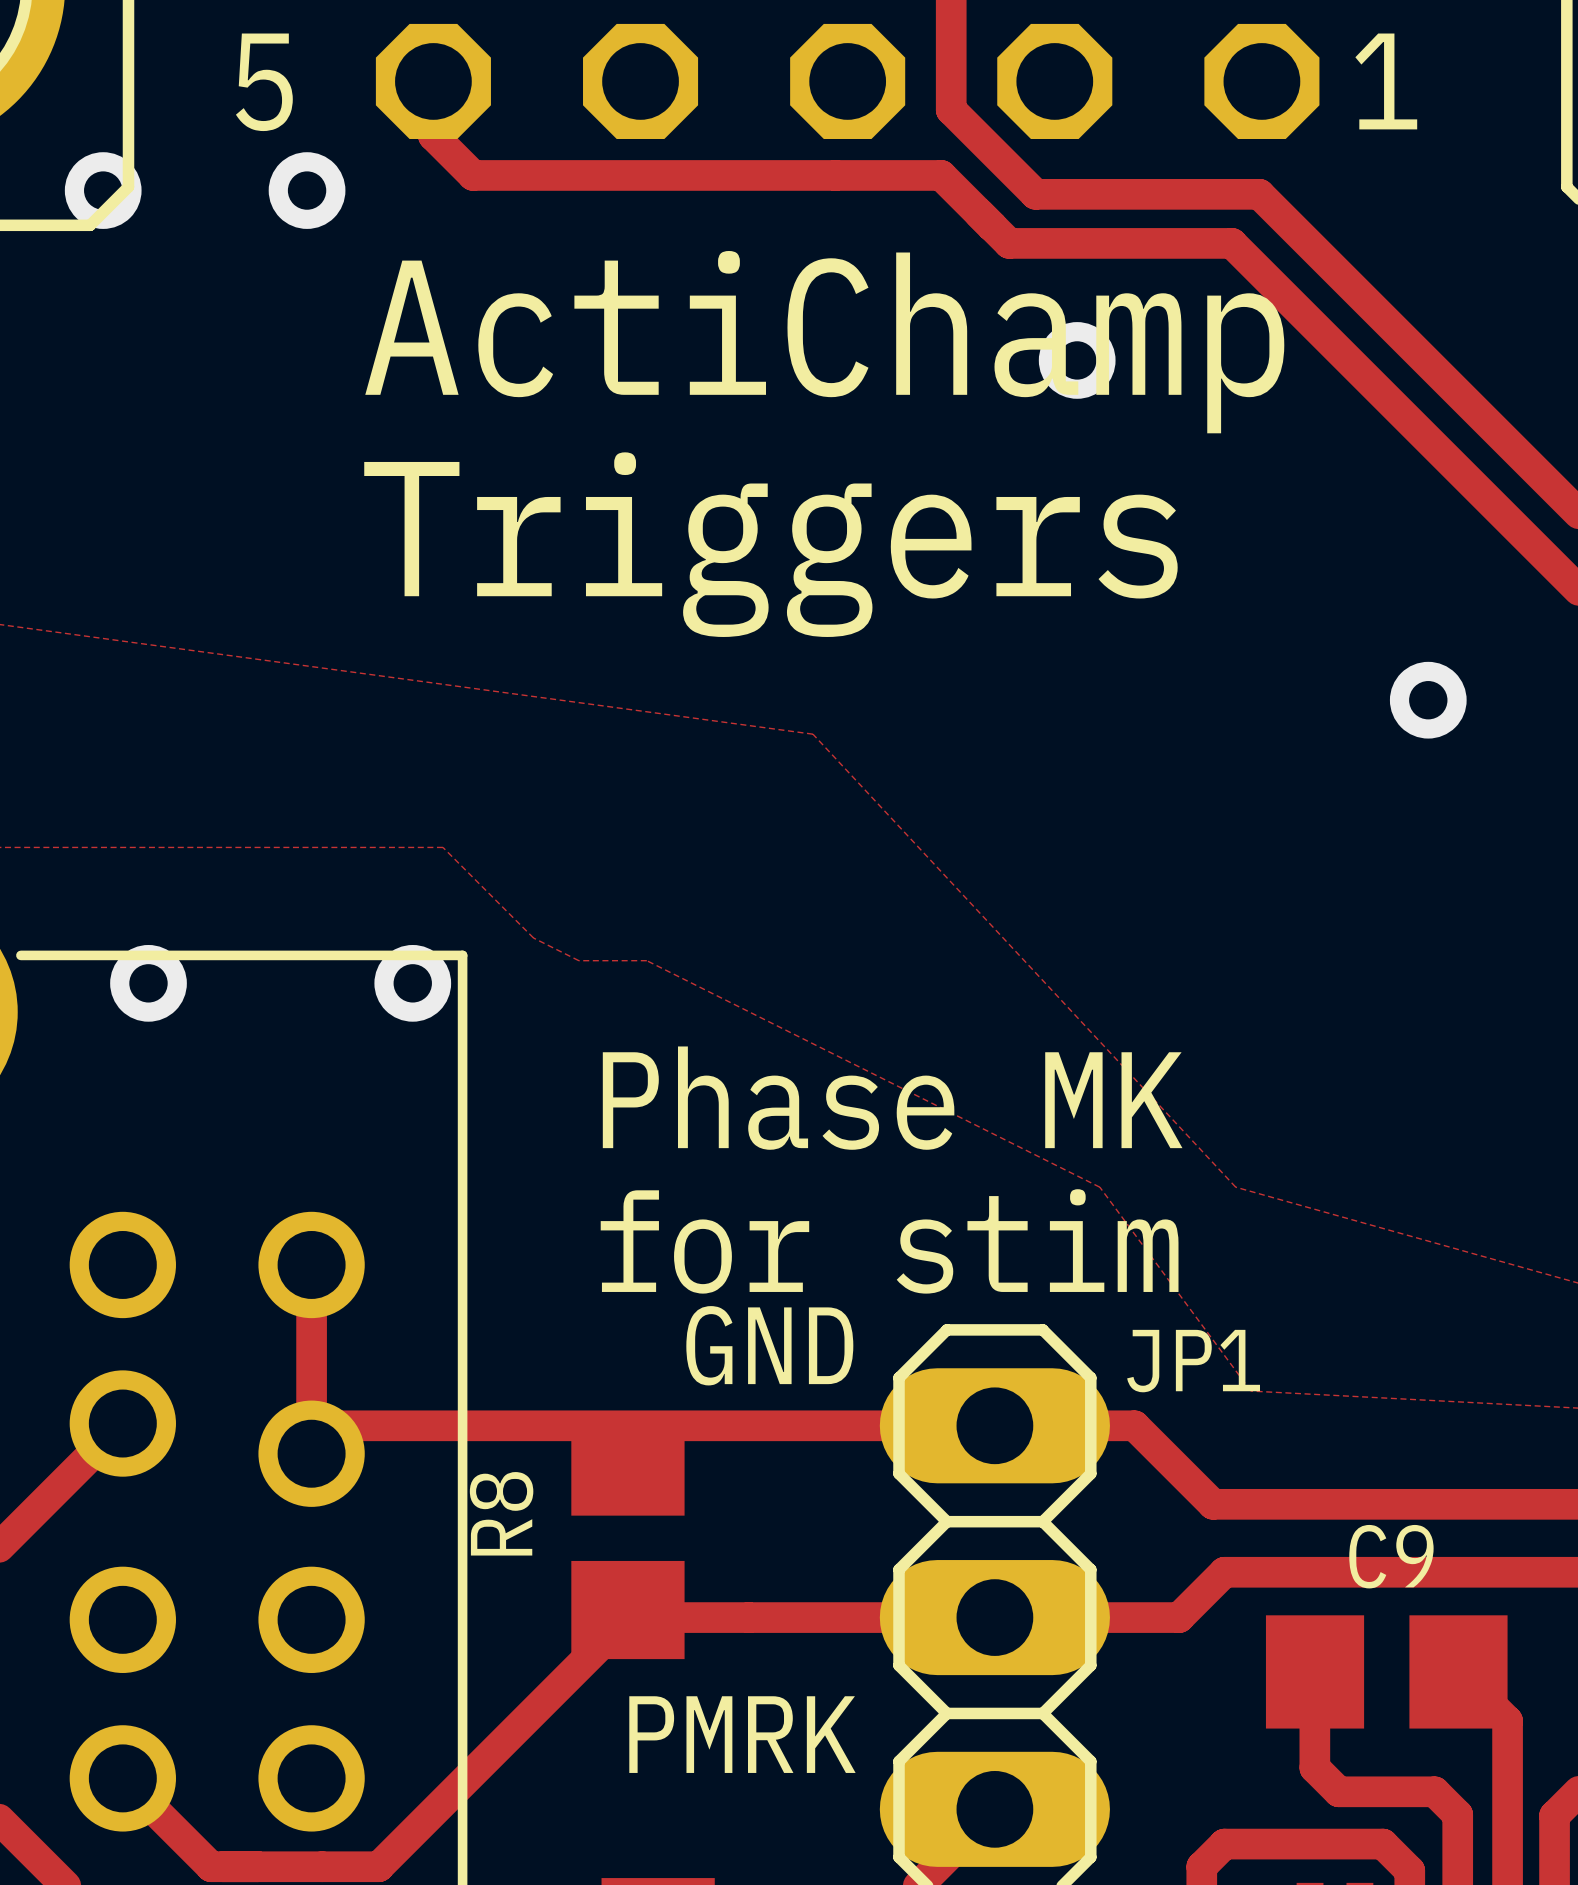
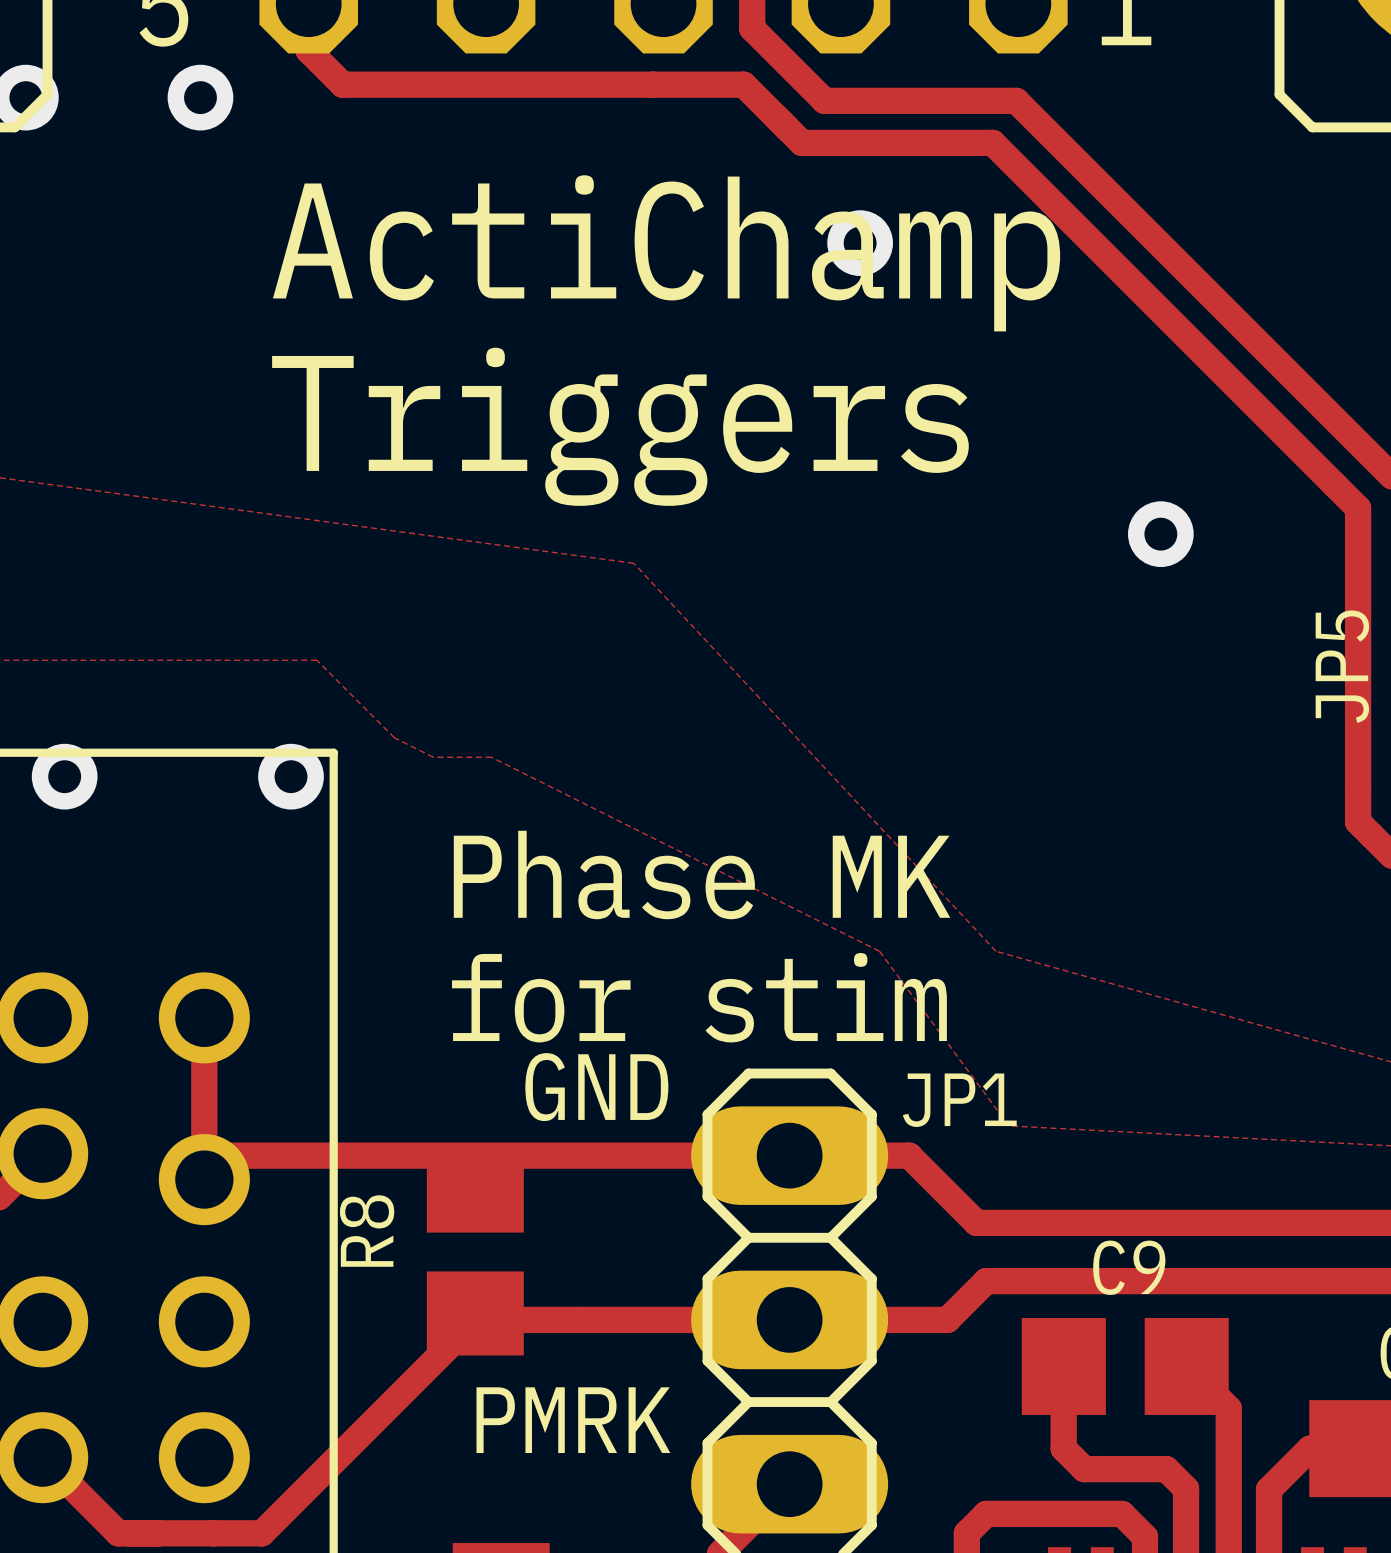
text position: ActiChamp (824, 342) -> ActiChamp (666, 253)
text position: Triggers (770, 544) -> Triggers (620, 426)

